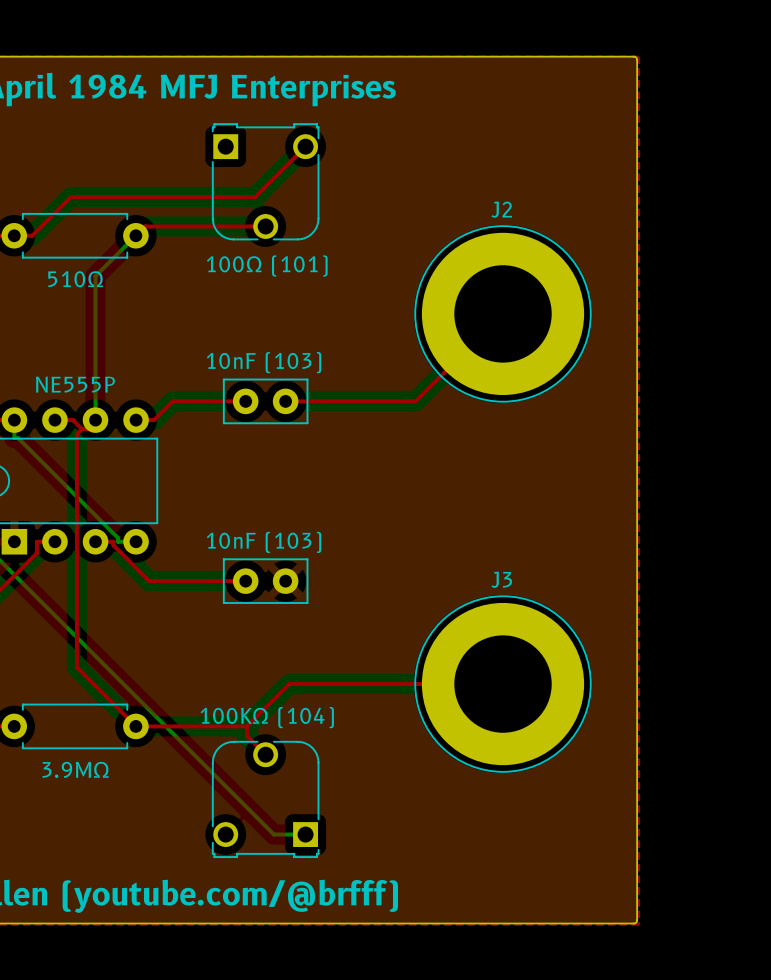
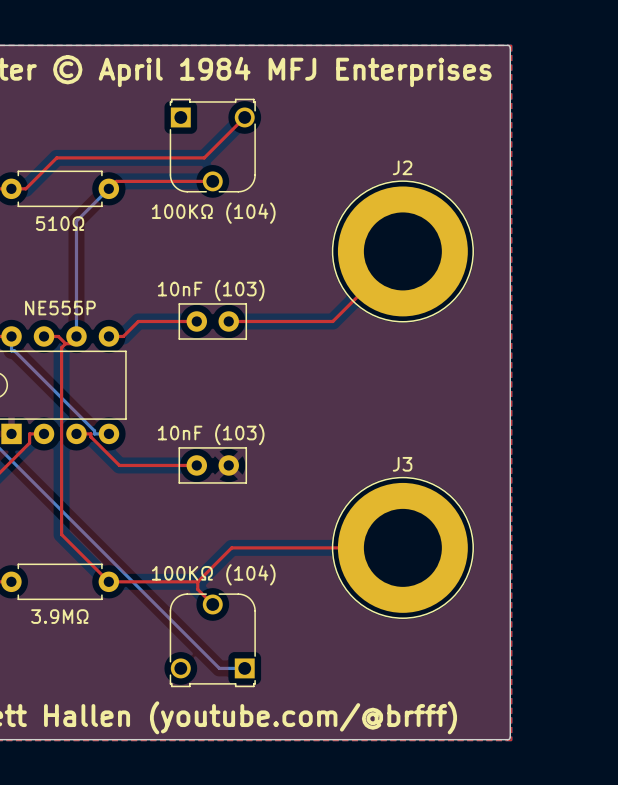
part value: 100Ω (101) (267, 265) -> 100KΩ (104) (213, 213)

